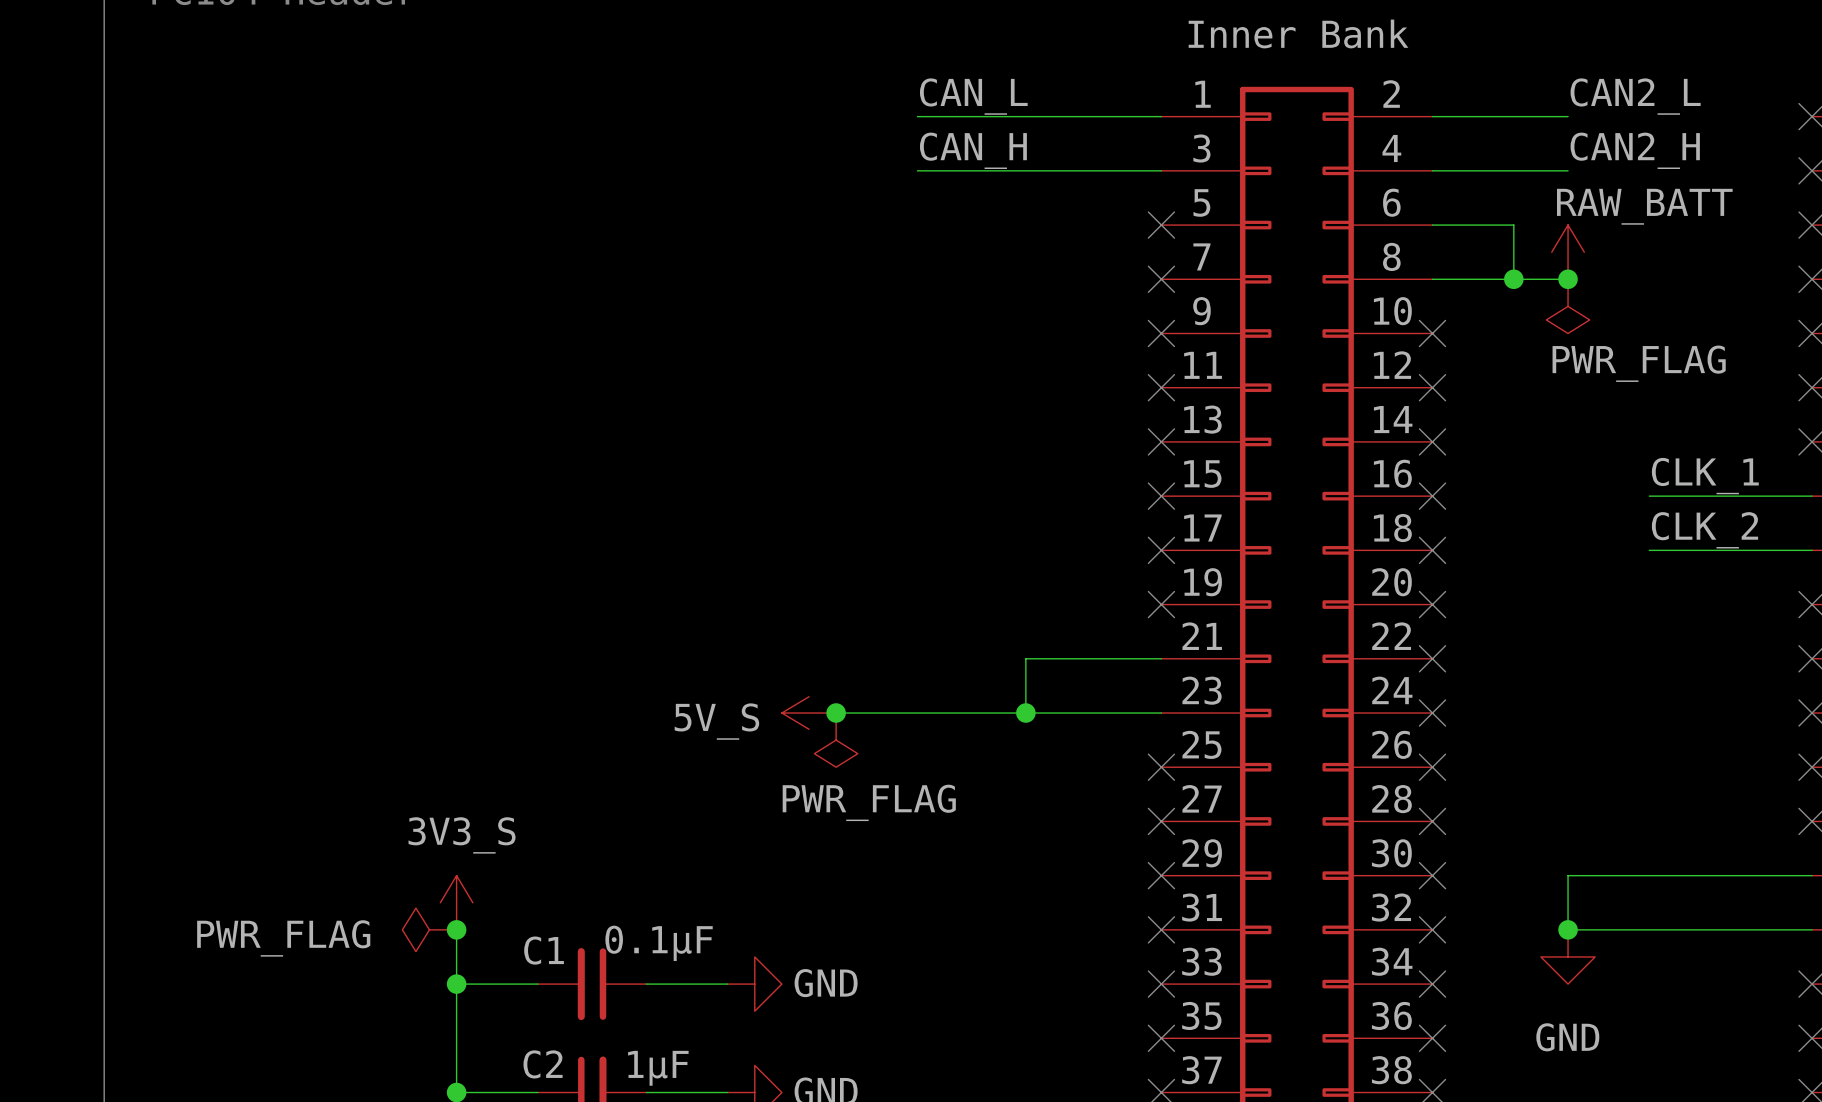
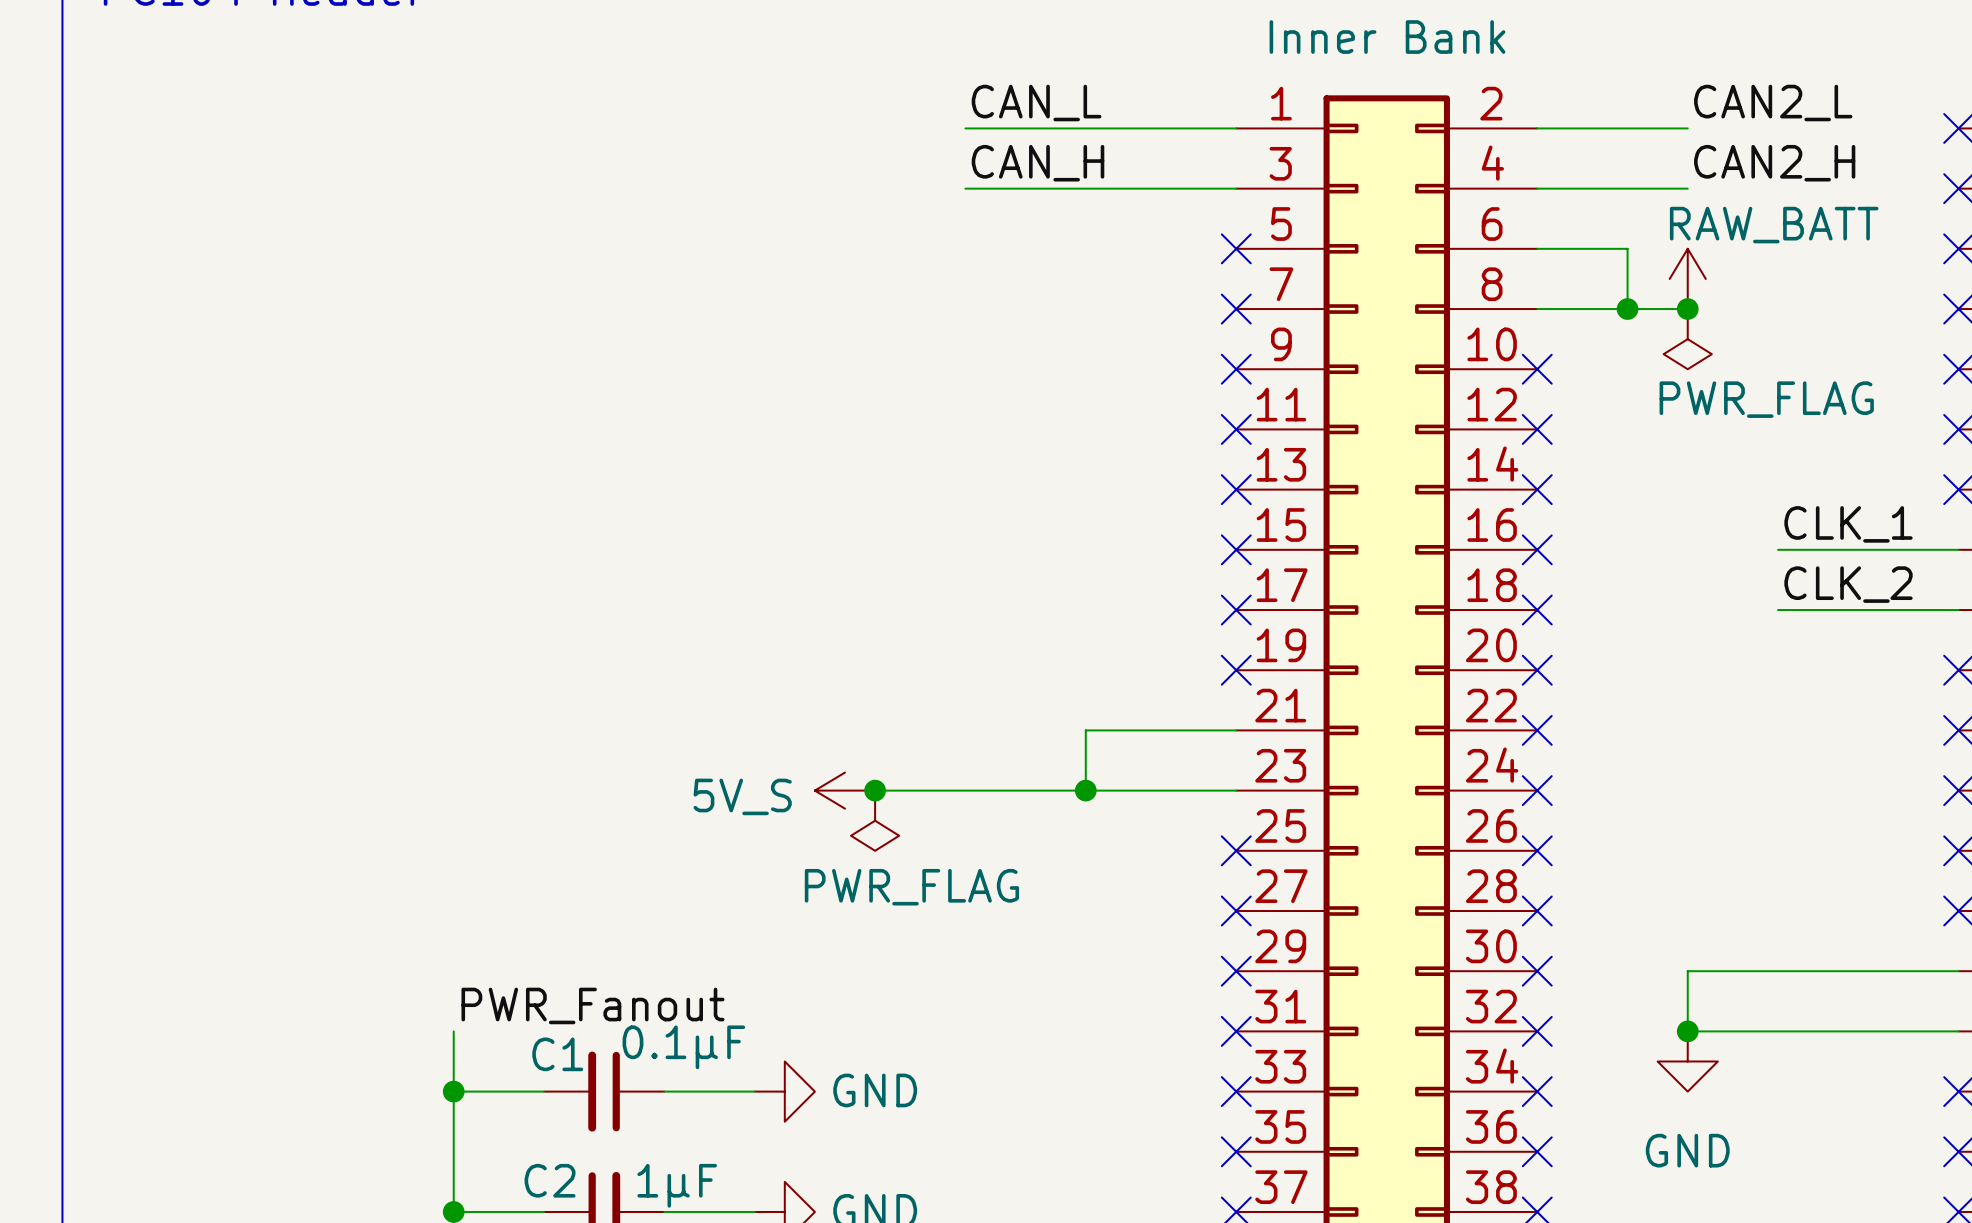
power symbol: 3V3_S (456, 902) -> none
label: none -> PWR_Fanout (592, 1005)
power symbol: PWR_FLAG (429, 929) -> none
junction: (456, 929) -> none

